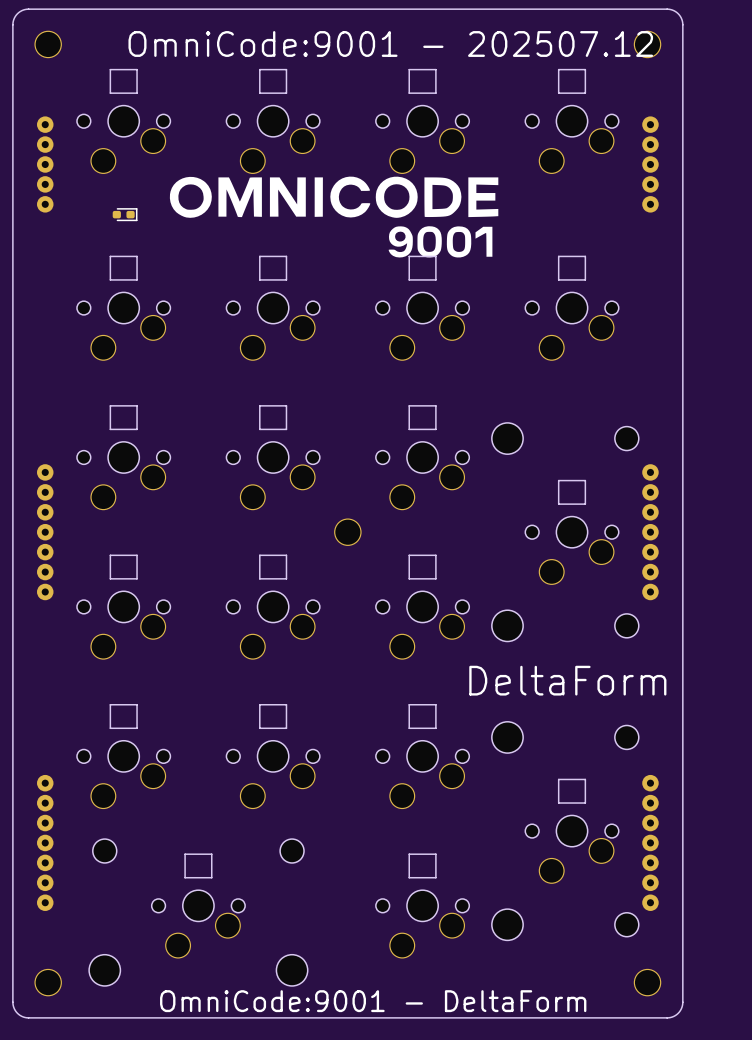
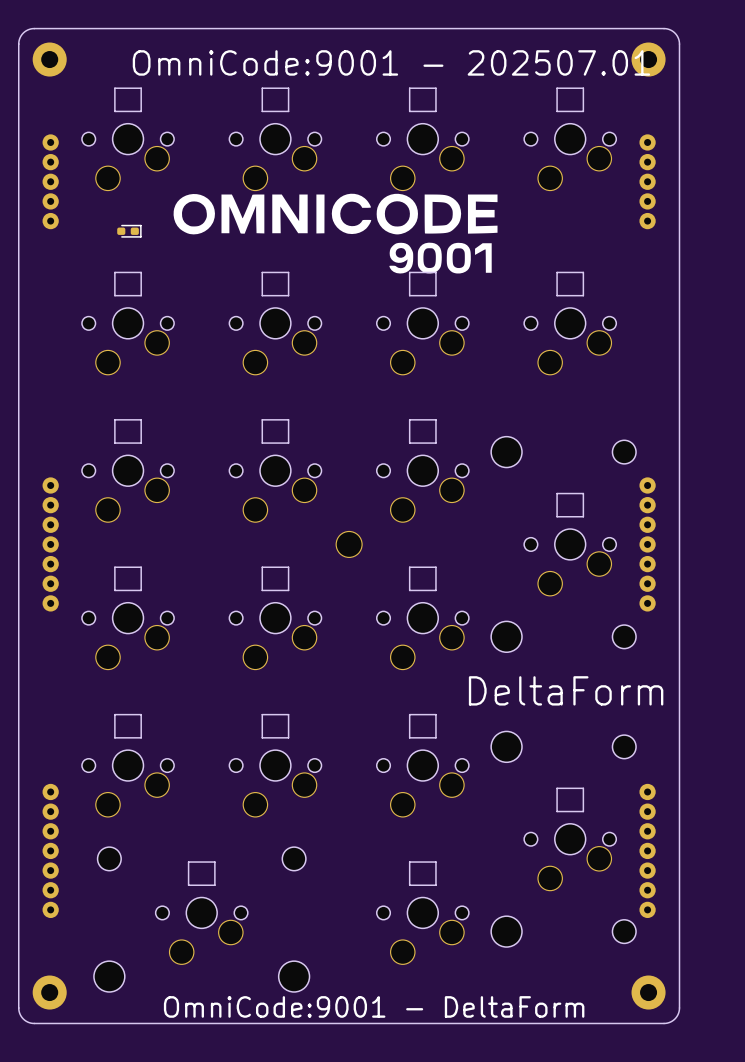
part footprint: [34, 30, 62, 59] -> [32, 42, 67, 77]
part footprint: [633, 30, 662, 59] -> [631, 42, 666, 77]
text: OmniCode:9001 - 202507.12 (390, 43) -> OmniCode:9001 - 202507.01 (391, 62)
part footprint: [34, 968, 62, 997] -> [32, 975, 67, 1010]
part footprint: [633, 968, 662, 997] -> [631, 975, 666, 1010]

